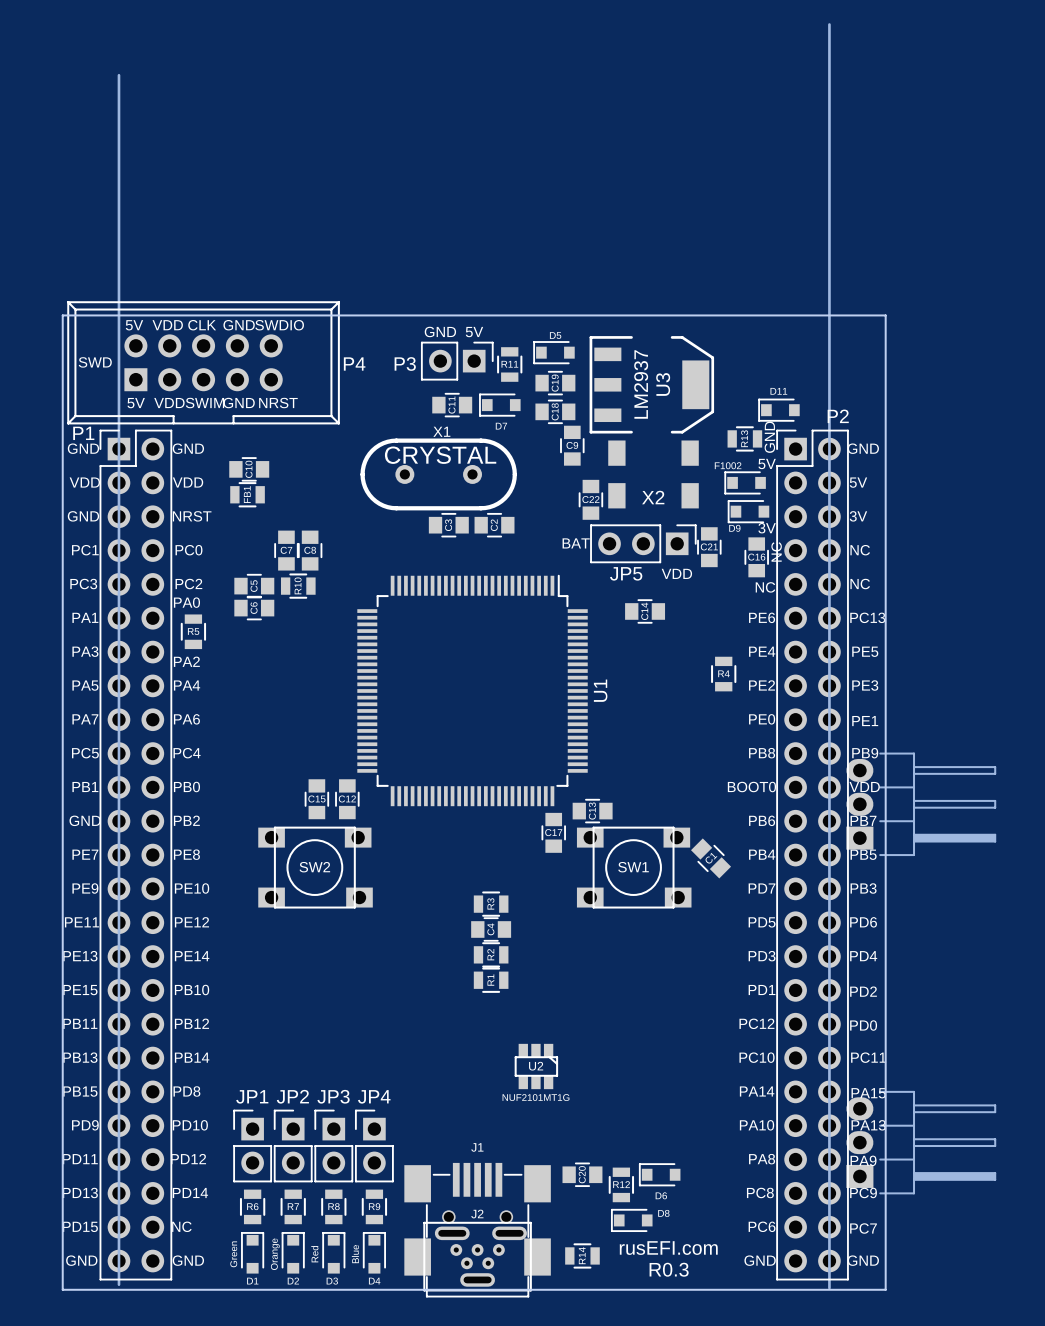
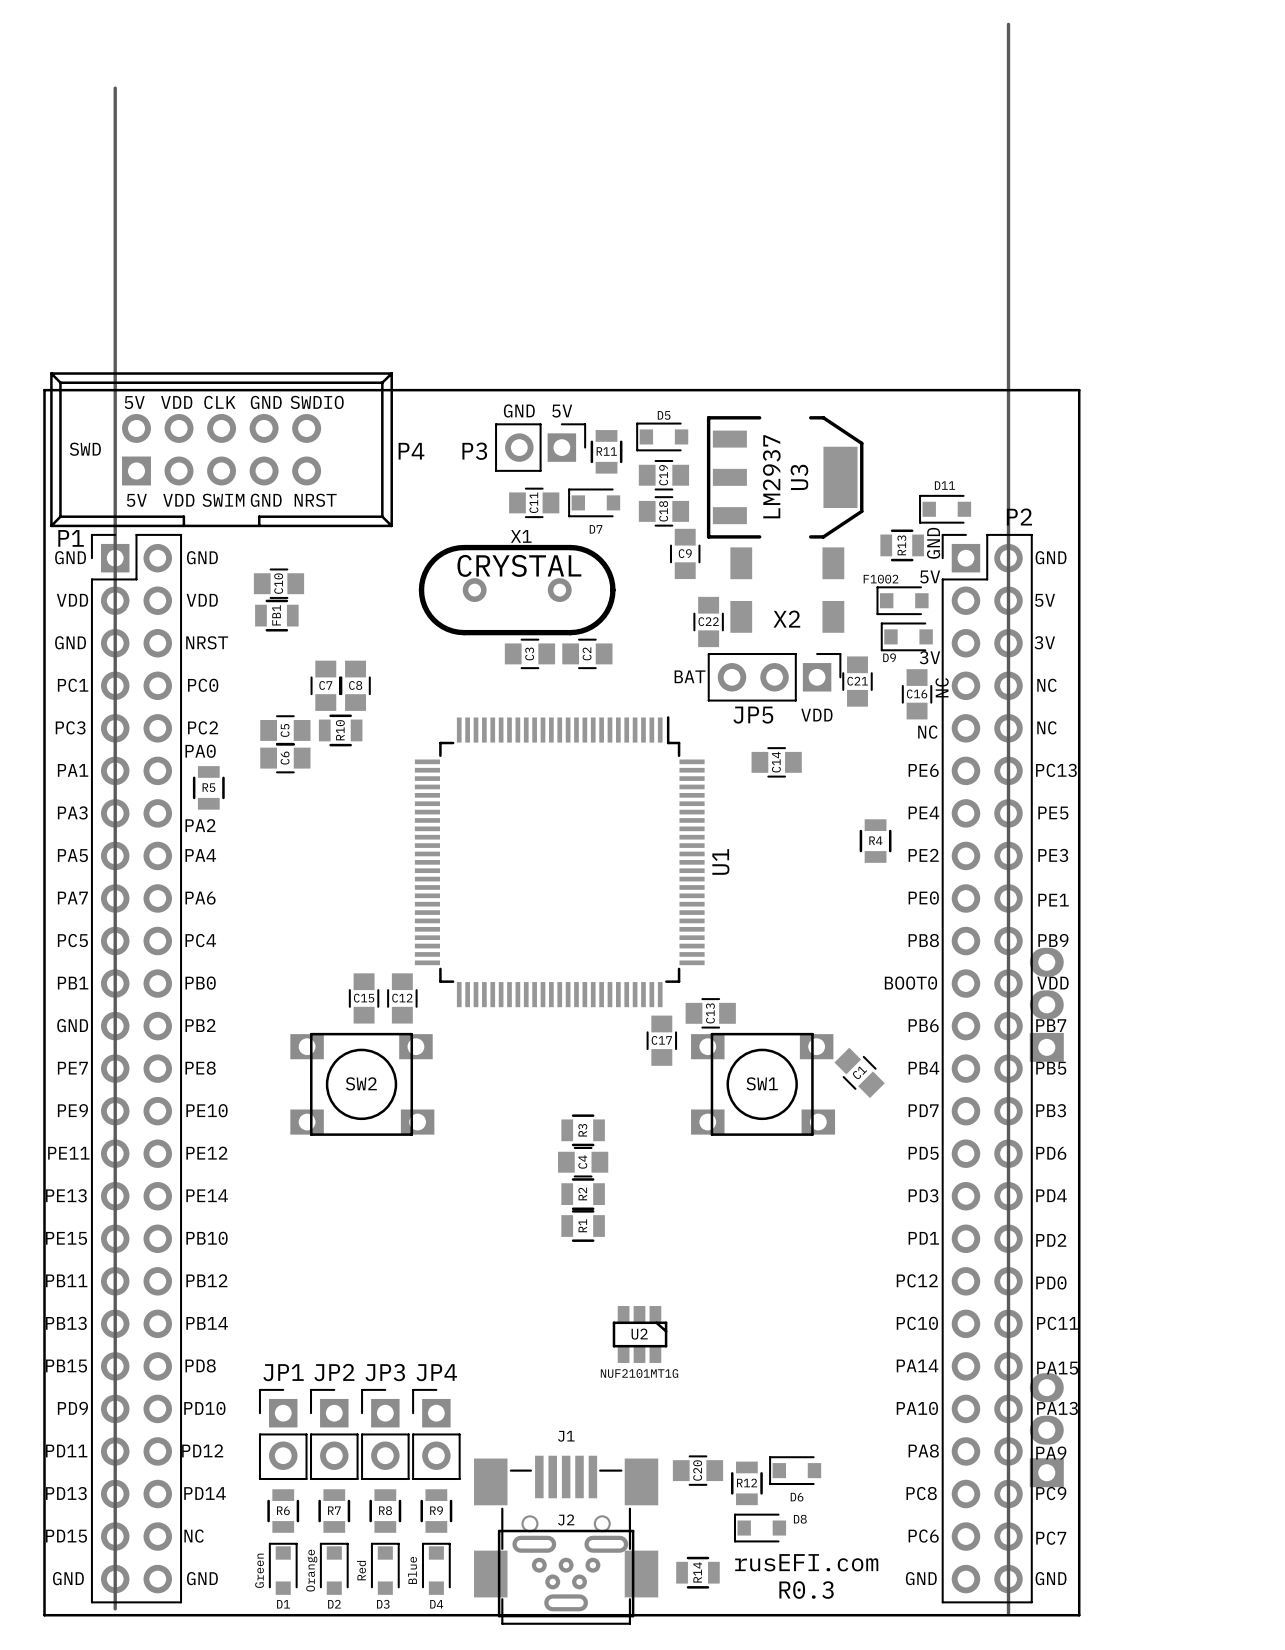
part: (921, 804) -> none
part: (921, 1142) -> none

